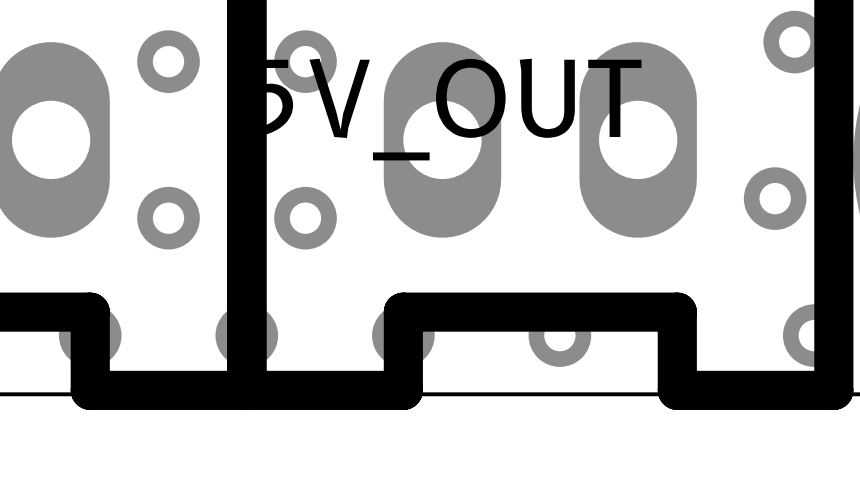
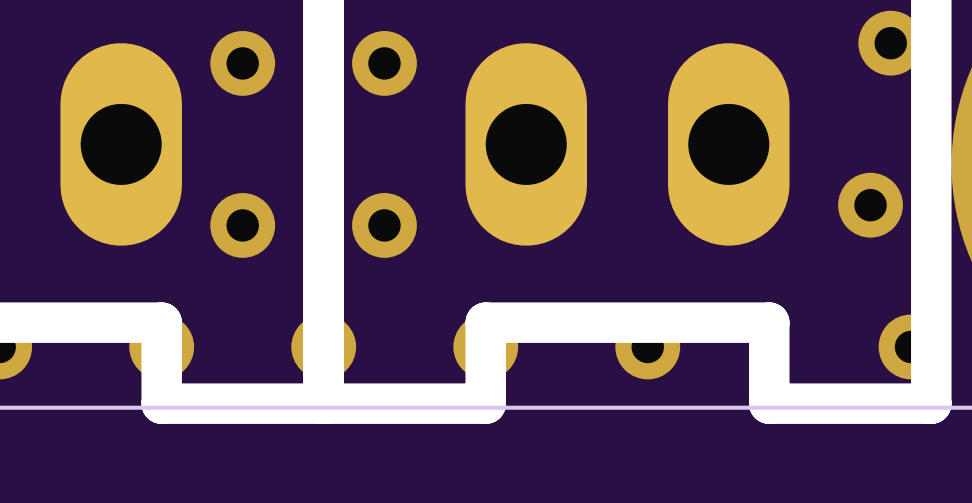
part value: 5V_OUT (445, 109) -> none

